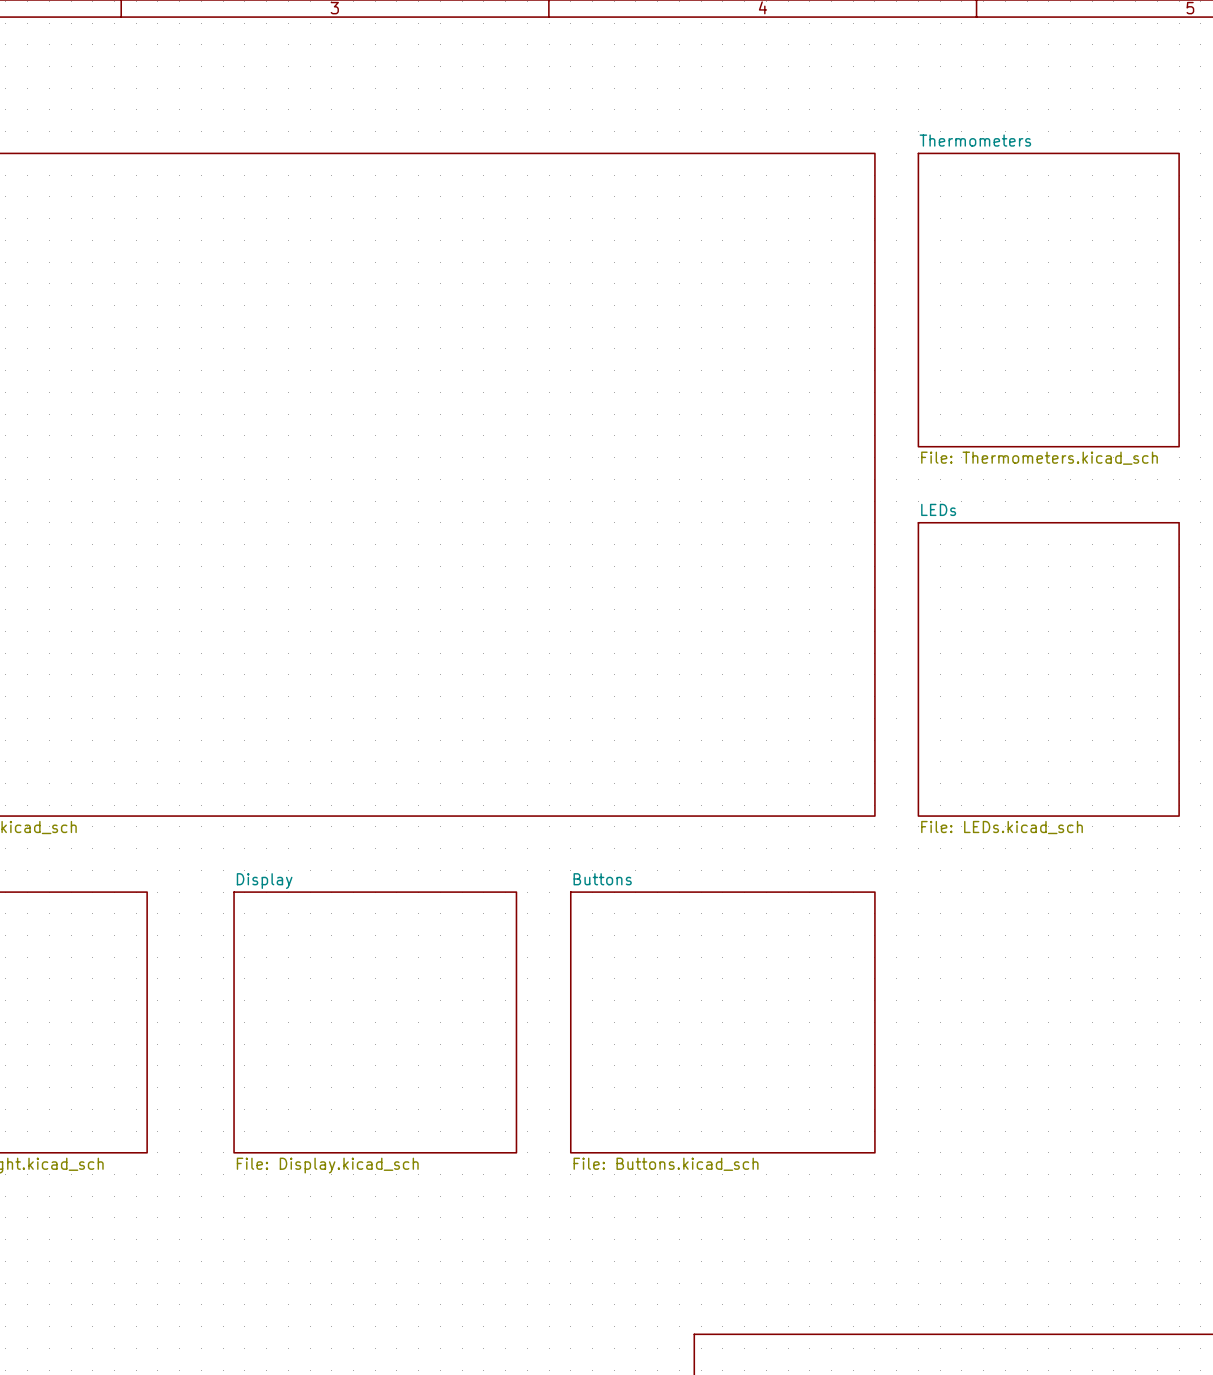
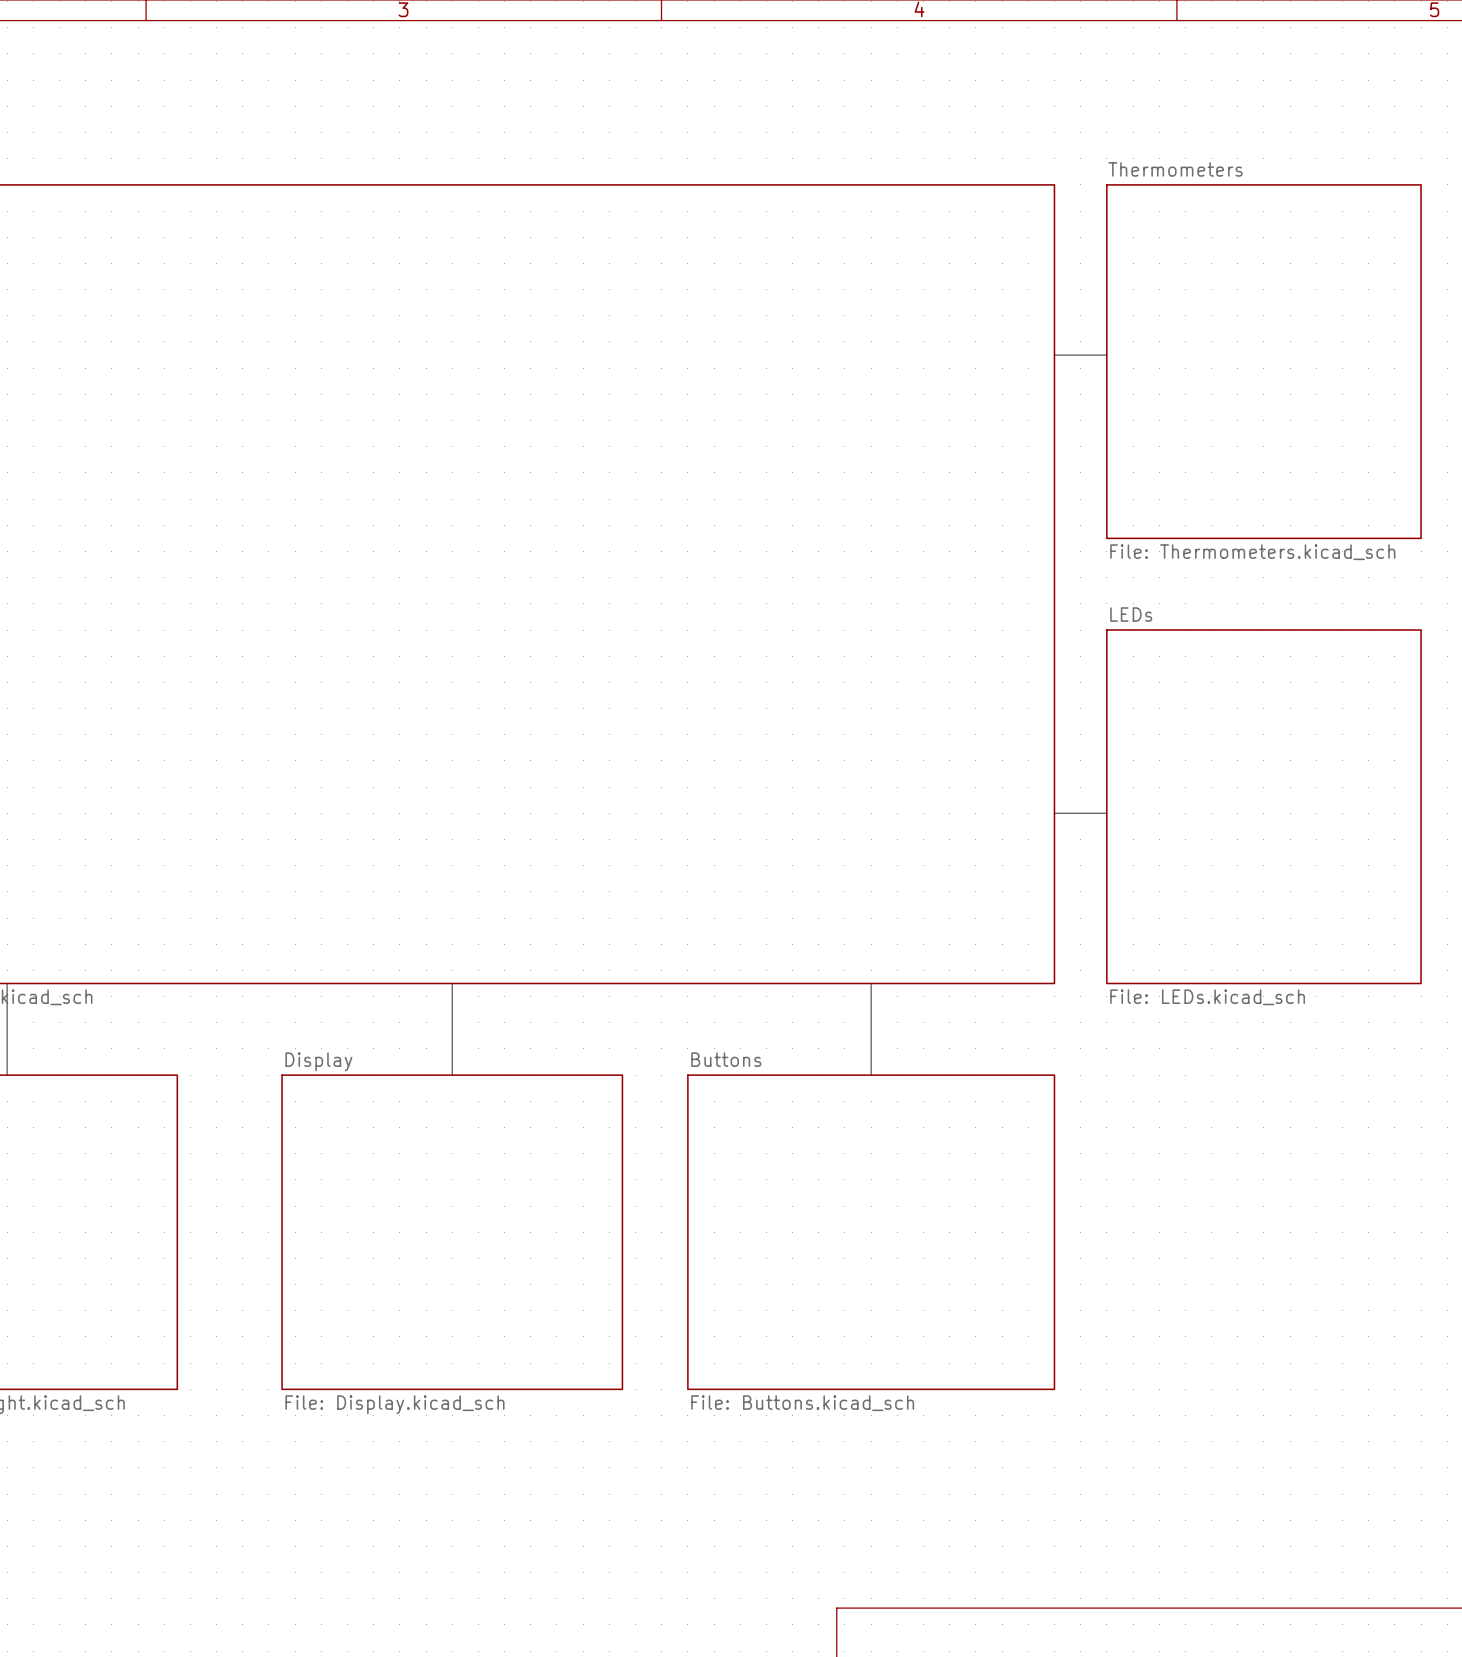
line: none -> (1054, 355) (1106, 355)
line: none -> (1054, 813) (1106, 813)
line: none -> (7, 983) (7, 1075)
line: none -> (452, 983) (452, 1075)
line: none -> (871, 983) (871, 1075)

